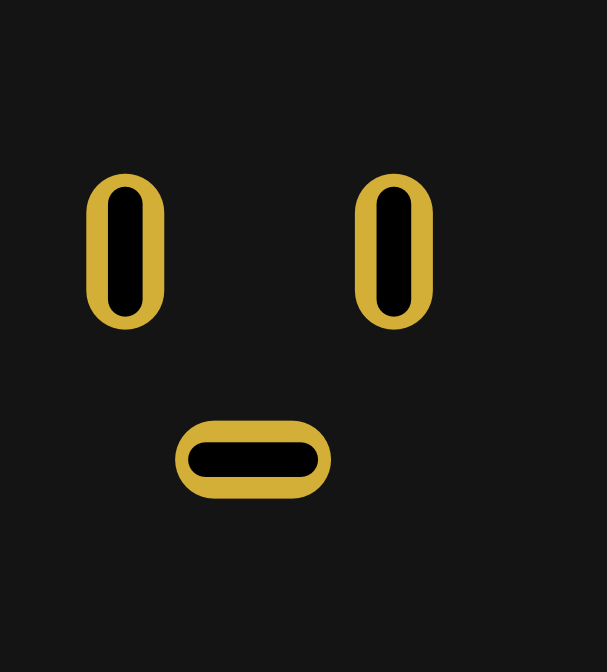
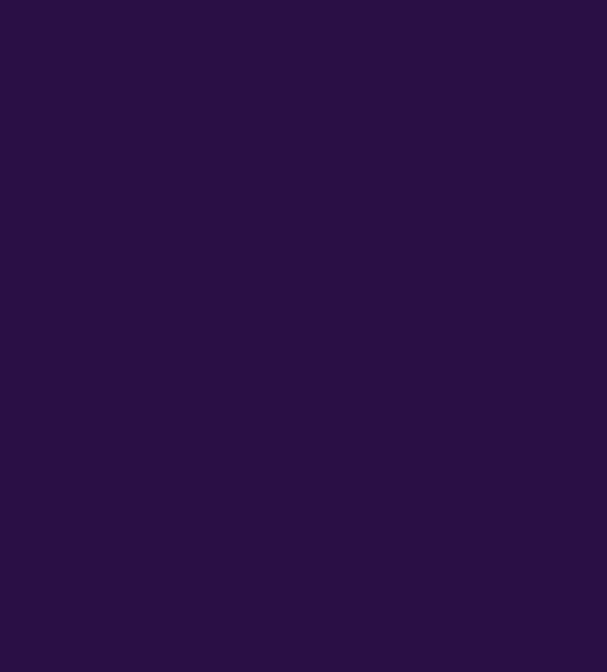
part: (259, 336) -> none

